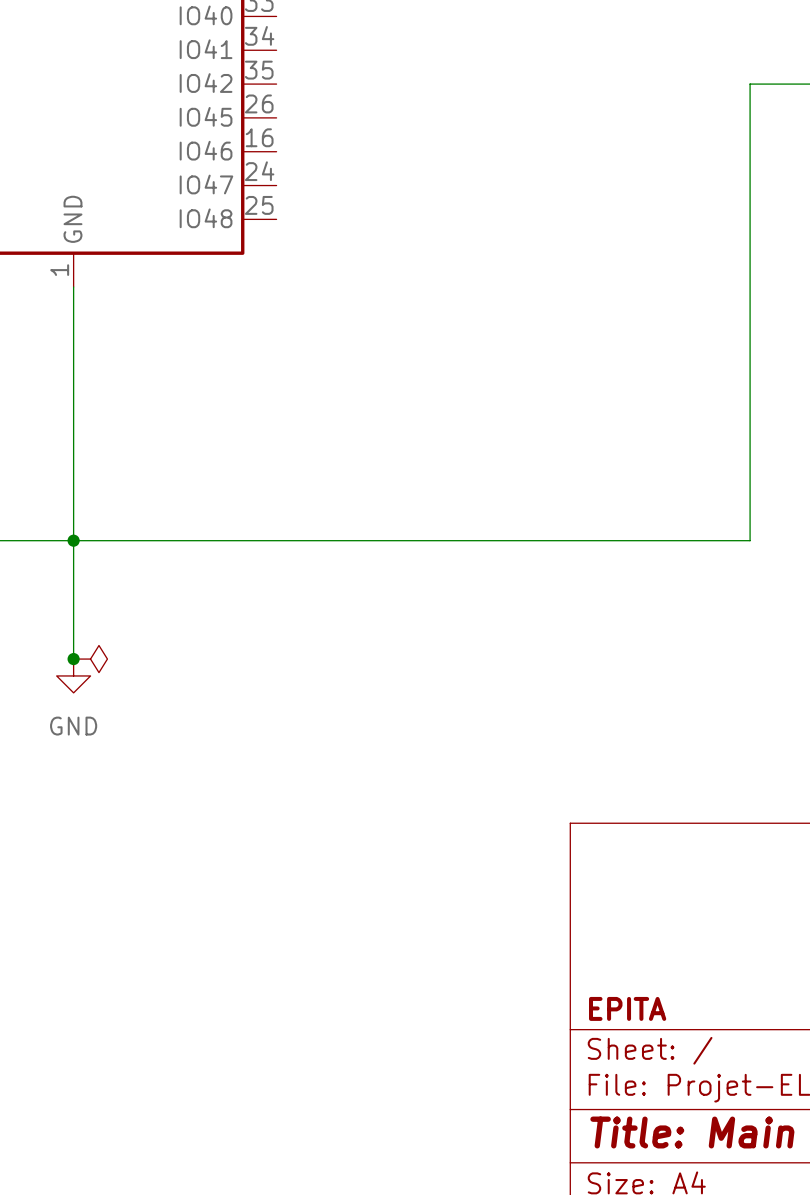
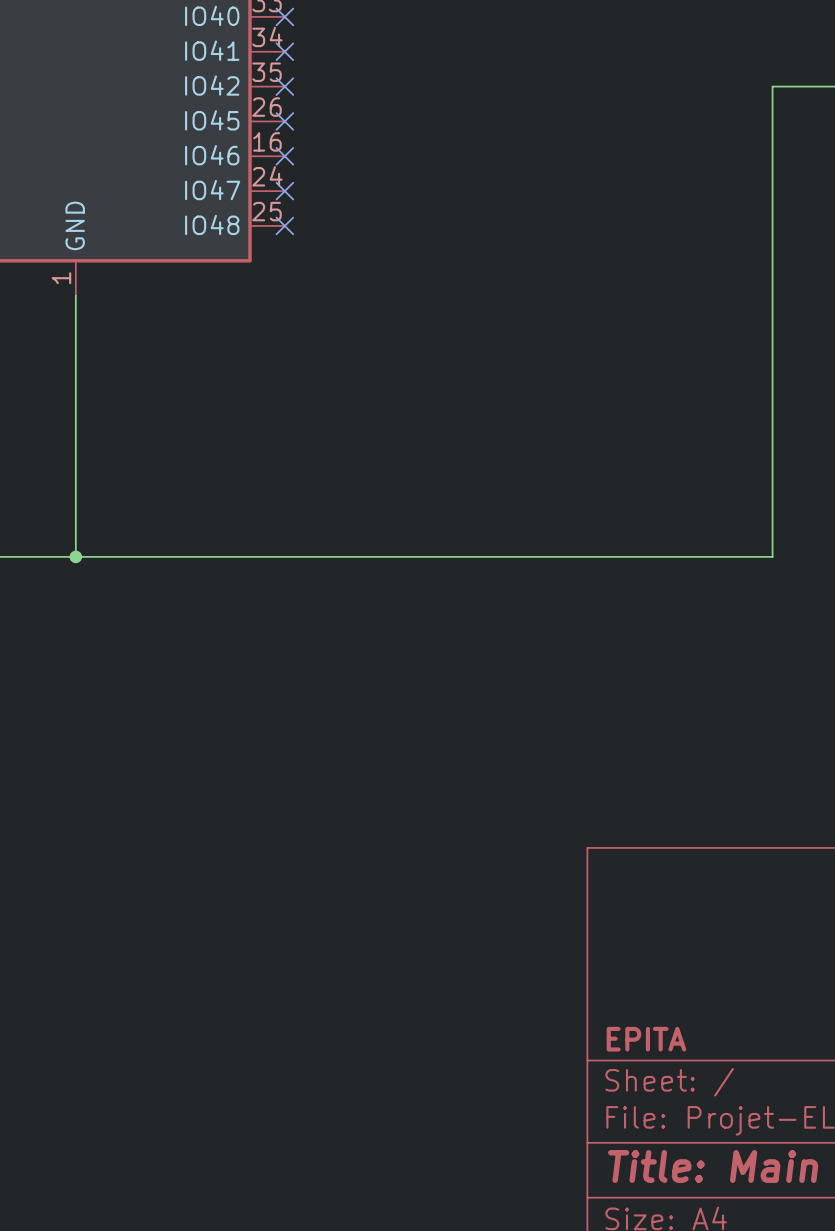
no-connect mark: none -> (284, 16)
no-connect mark: none -> (284, 51)
no-connect mark: none -> (284, 86)
no-connect mark: none -> (284, 121)
no-connect mark: none -> (284, 156)
no-connect mark: none -> (284, 191)
no-connect mark: none -> (284, 225)
wire: (73, 540) (73, 659) -> none
junction: (73, 659) -> none
power symbol: (90, 659) -> none
power symbol: GND (73, 675) -> none

